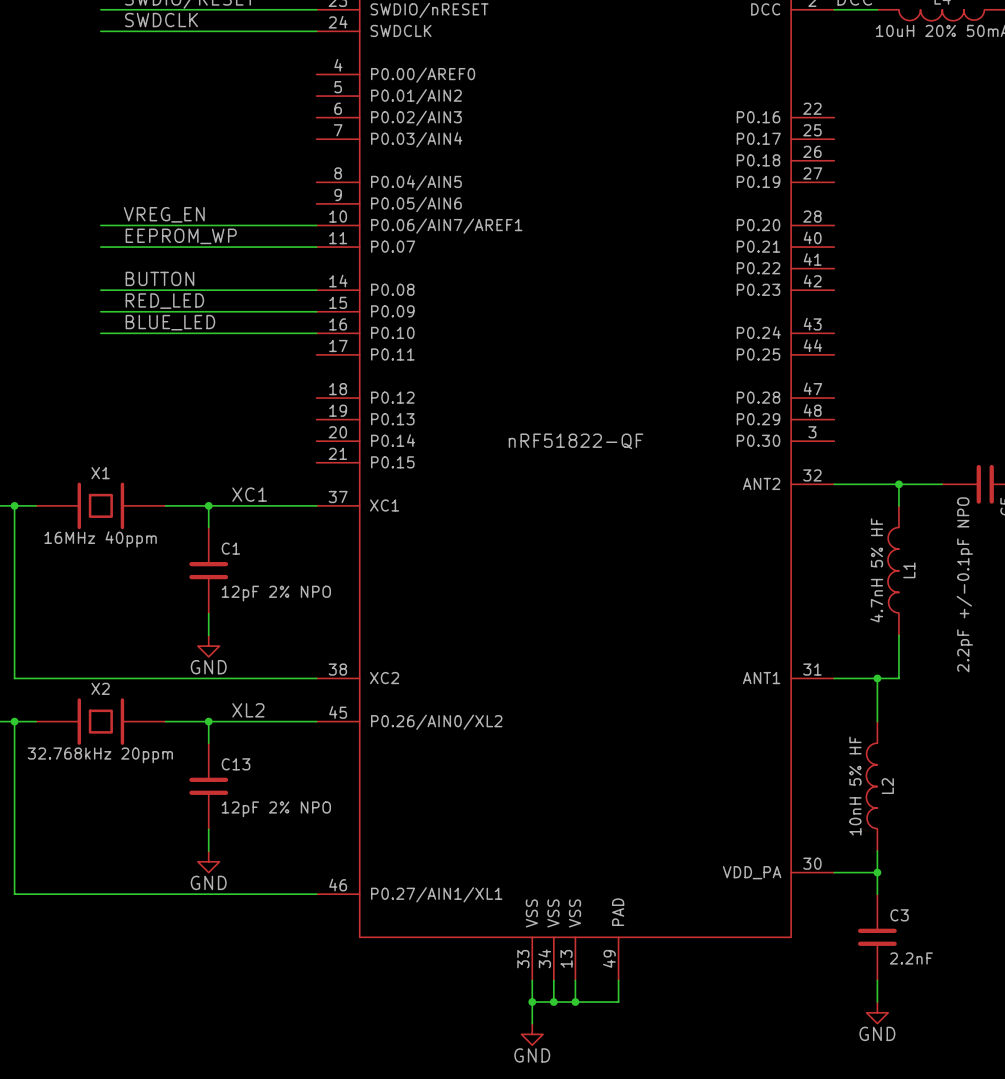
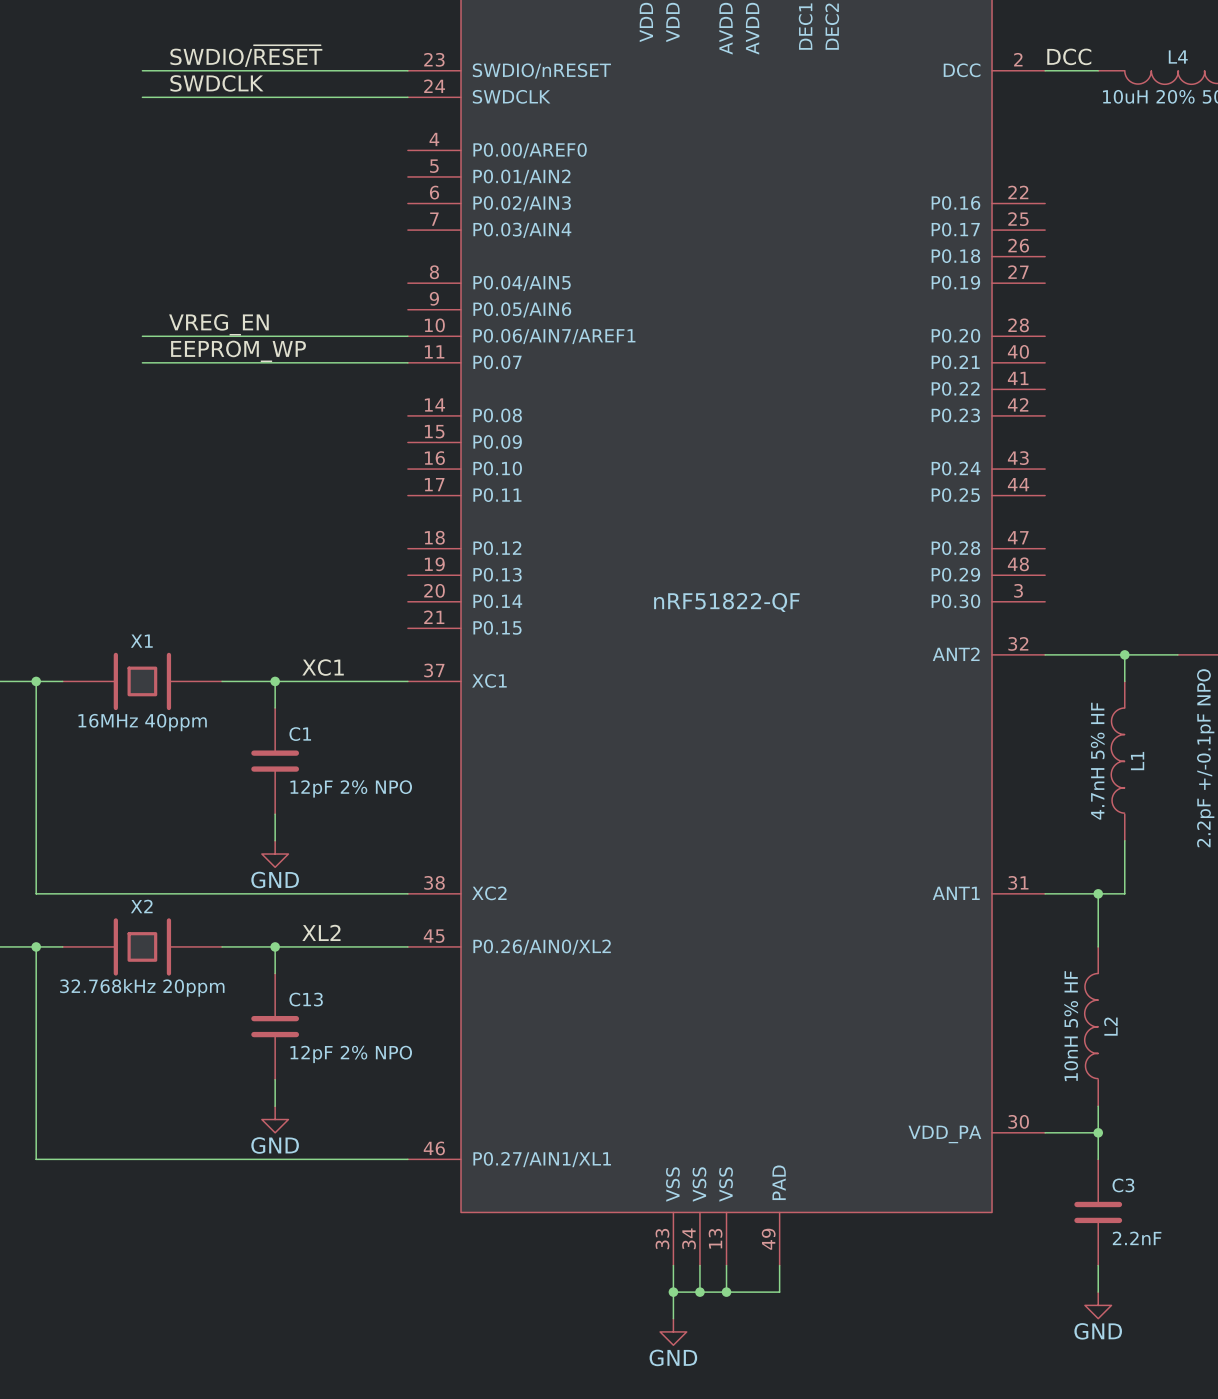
label: BUTTON (159, 278) -> none
wire: (100, 290) (316, 290) -> none
label: RED_LED (164, 301) -> none
wire: (100, 311) (316, 311) -> none
label: BLUE_LED (170, 322) -> none
wire: (100, 333) (316, 333) -> none

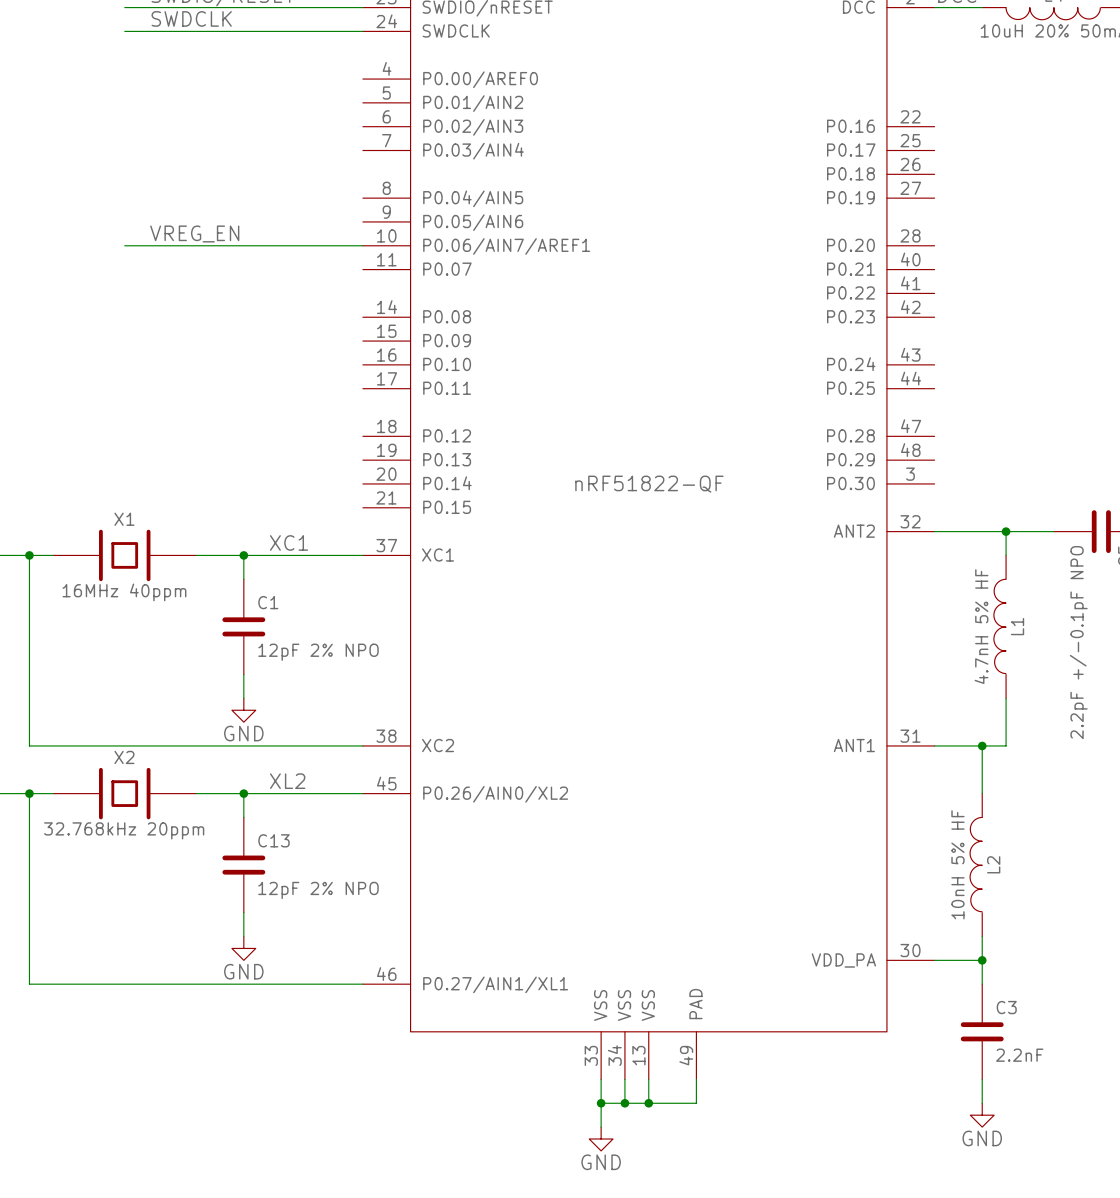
label: EEPROM_WP (238, 351) -> none
wire: (142, 362) (407, 362) -> none

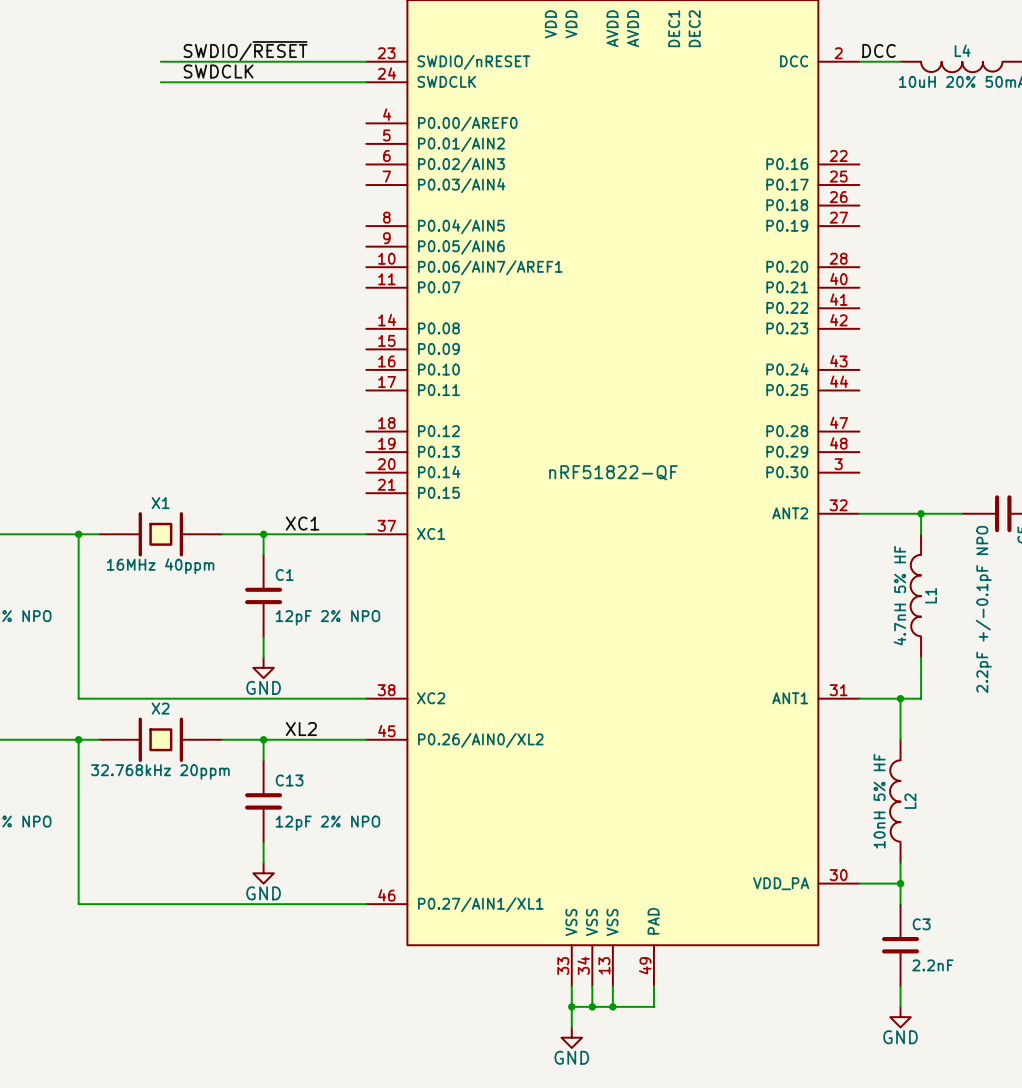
label: VREG_EN (194, 233) -> none
wire: (124, 245) (362, 245) -> none

